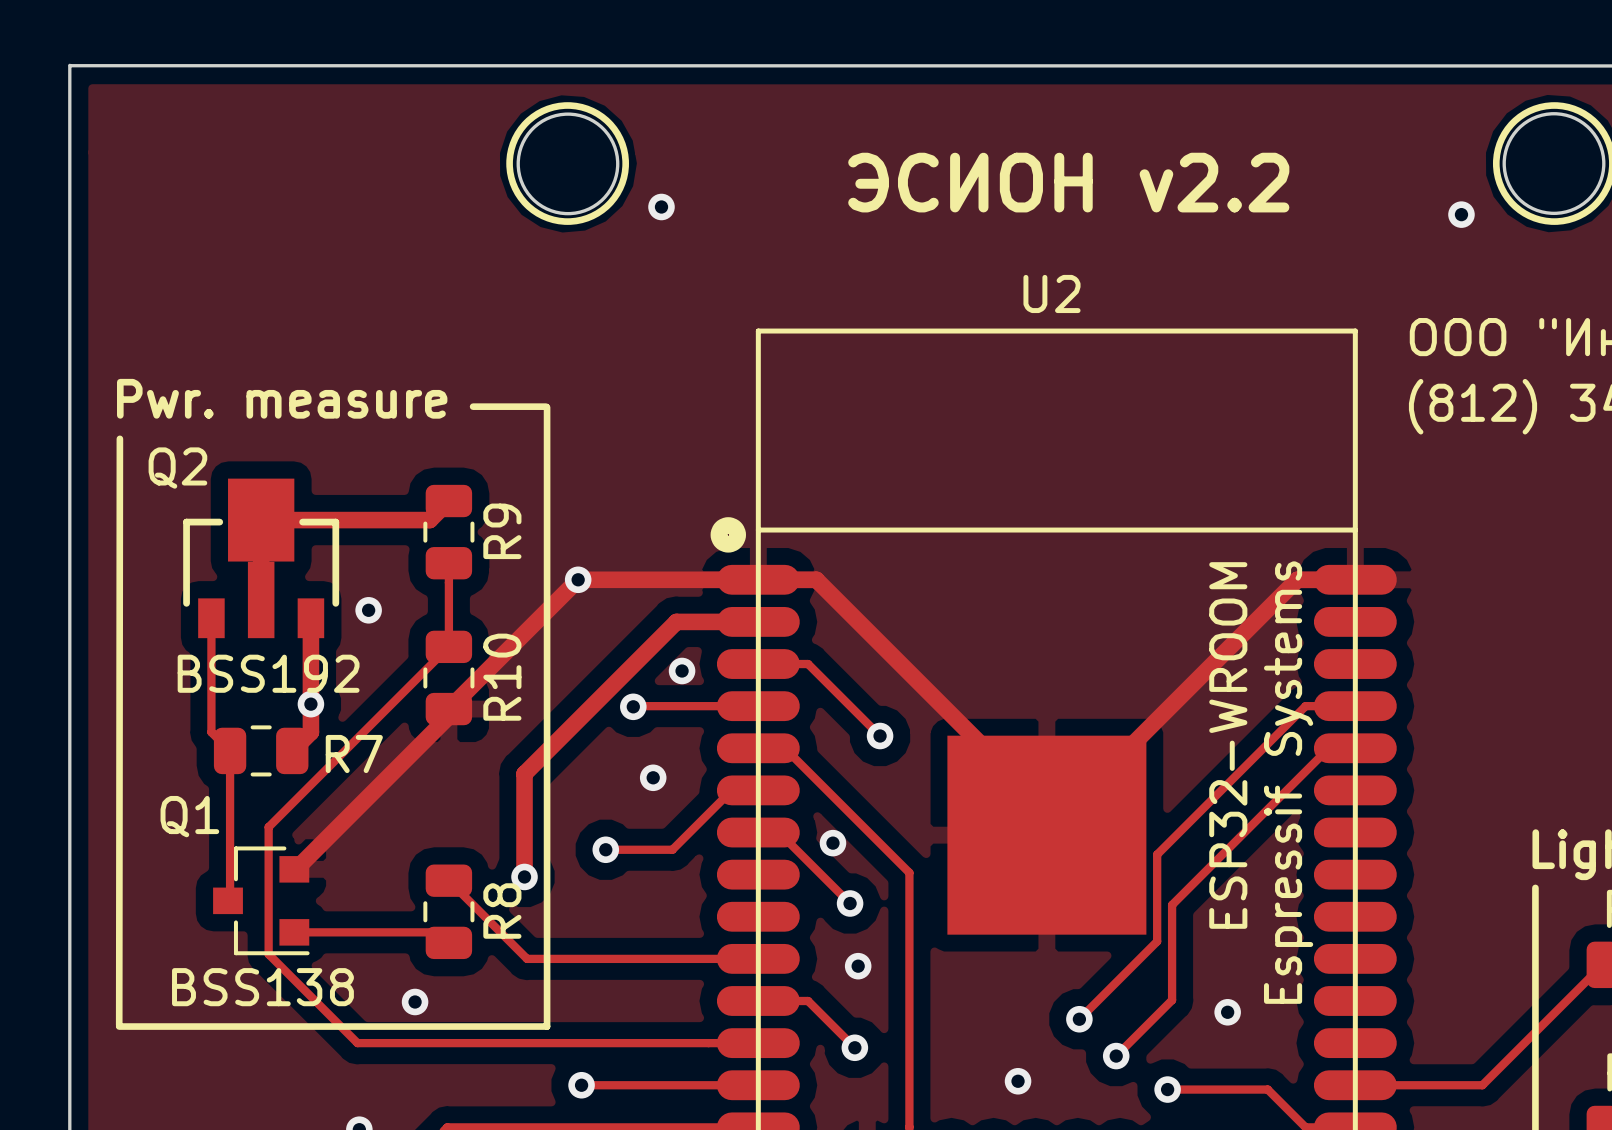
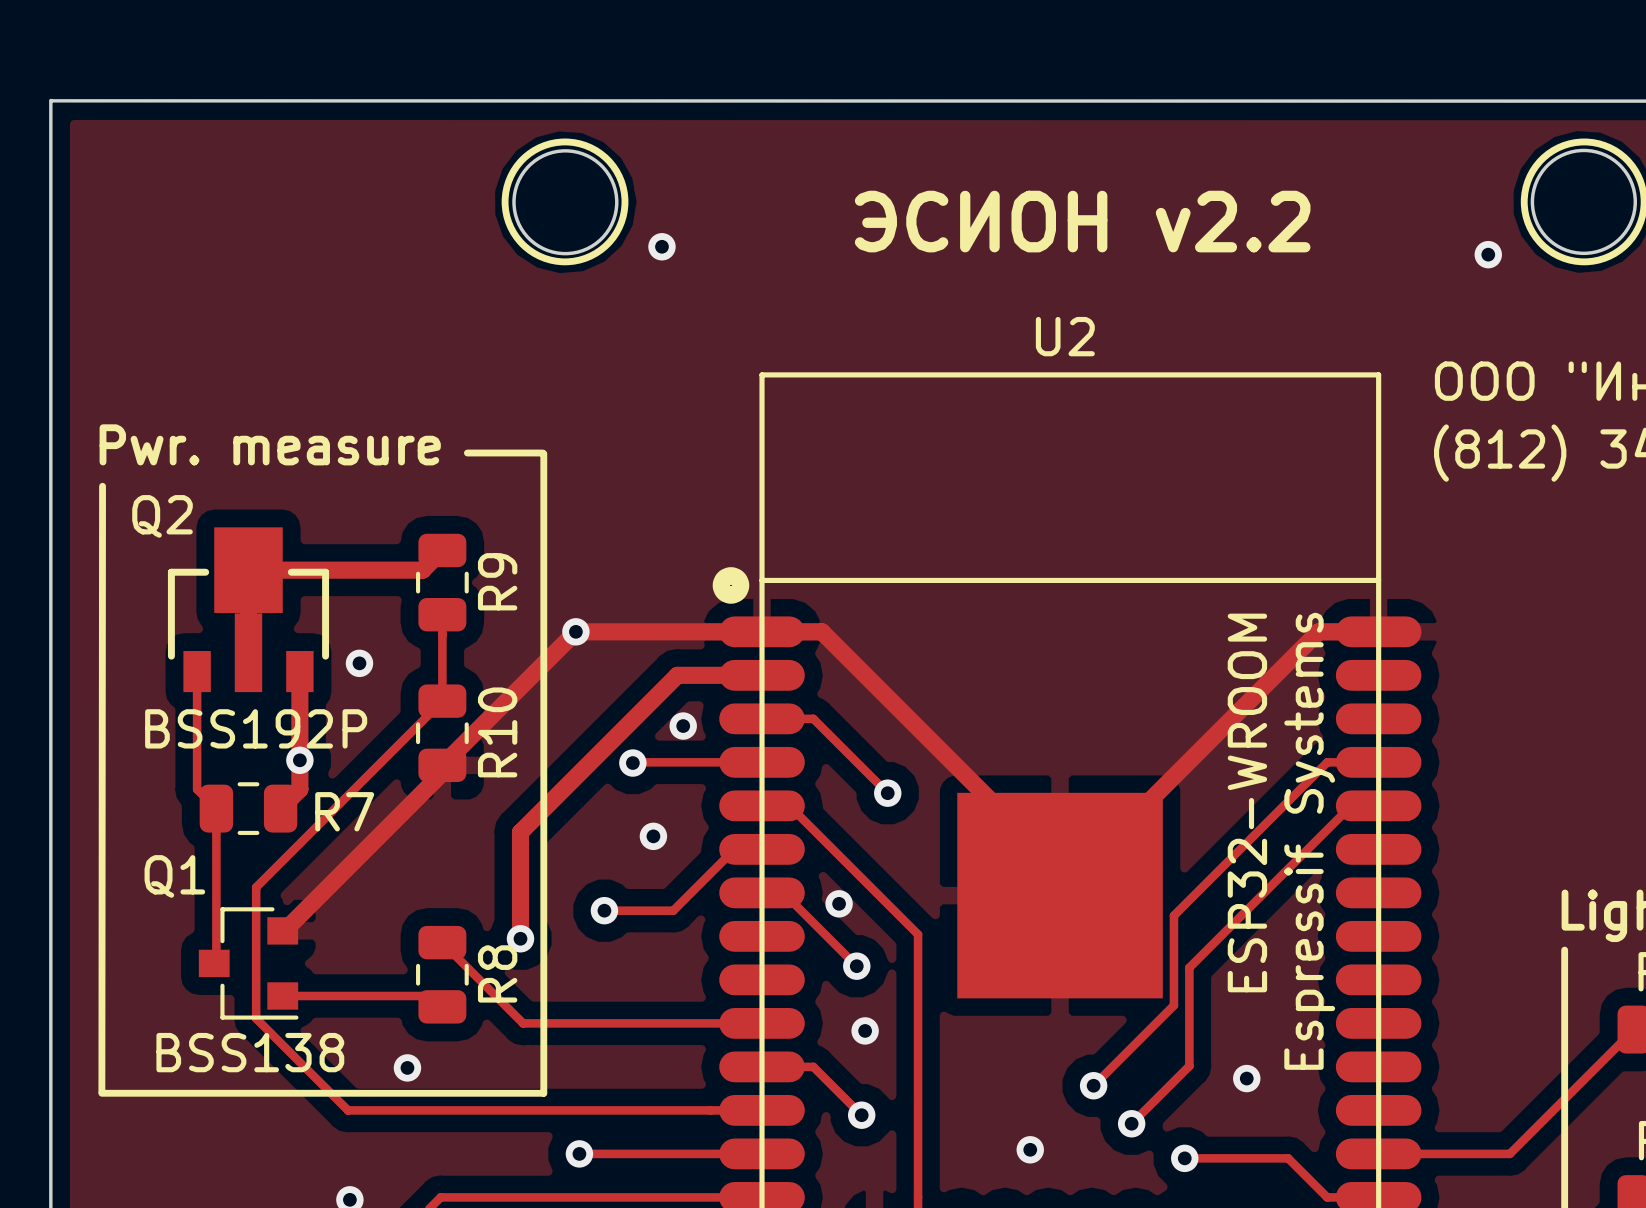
Q2 value: BSS192 (268, 673) -> BSS192P (256, 728)

